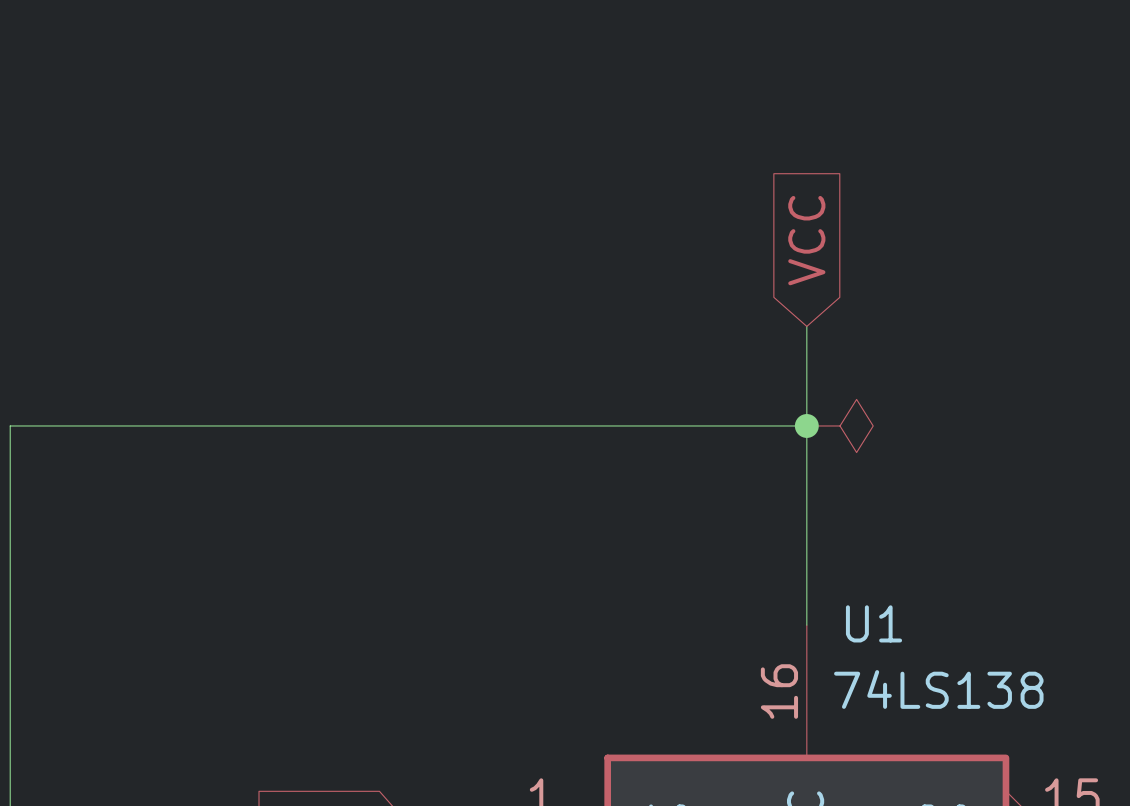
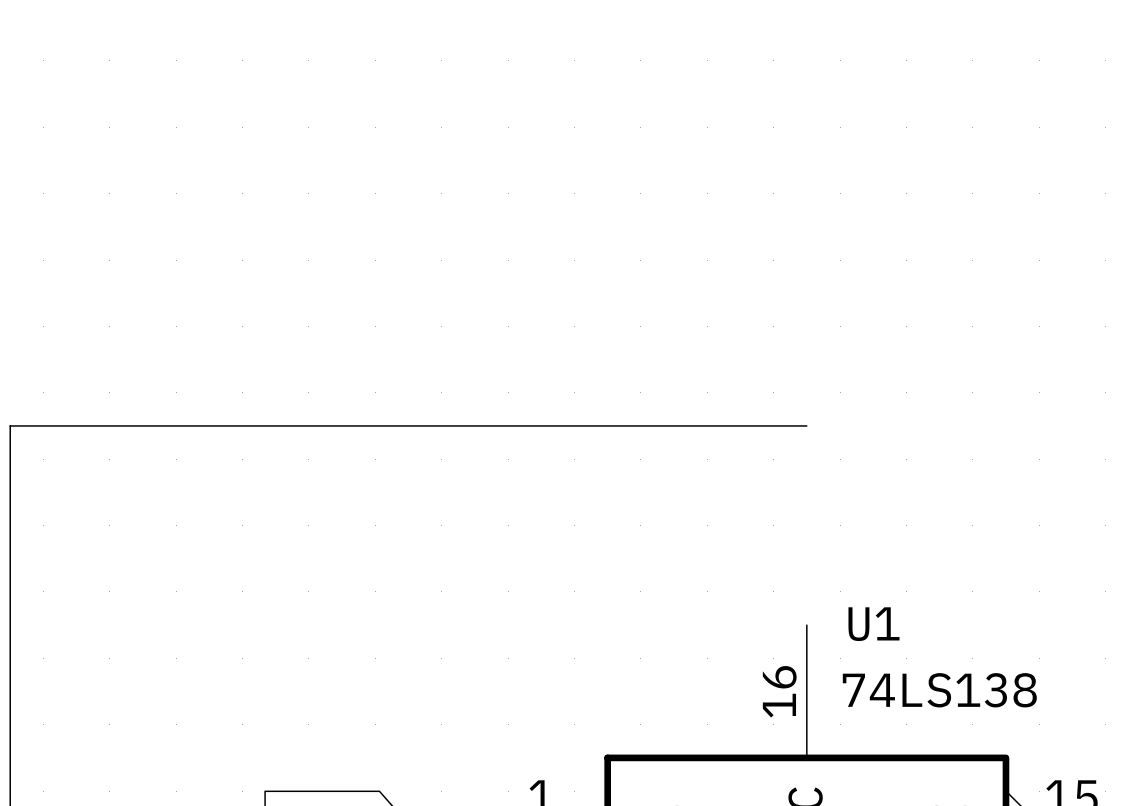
global label: VCC (806, 240) -> none
wire: (806, 326) (806, 625) -> none
junction: (806, 425) -> none
power symbol: (840, 425) -> none

